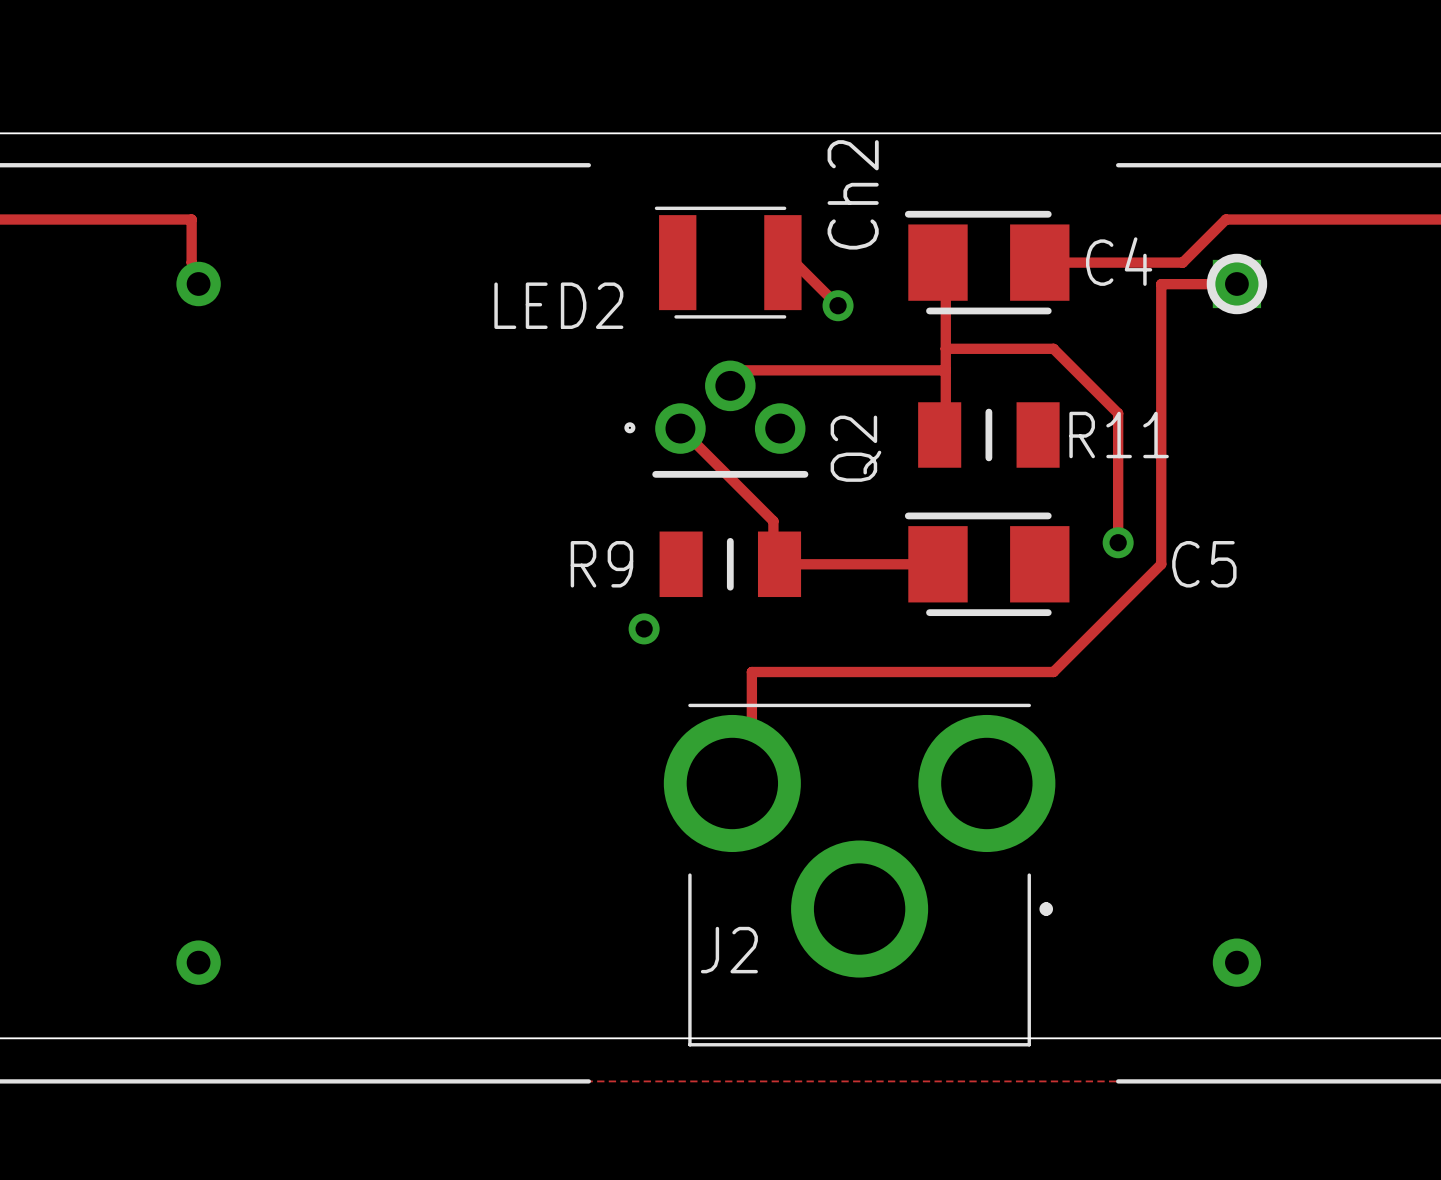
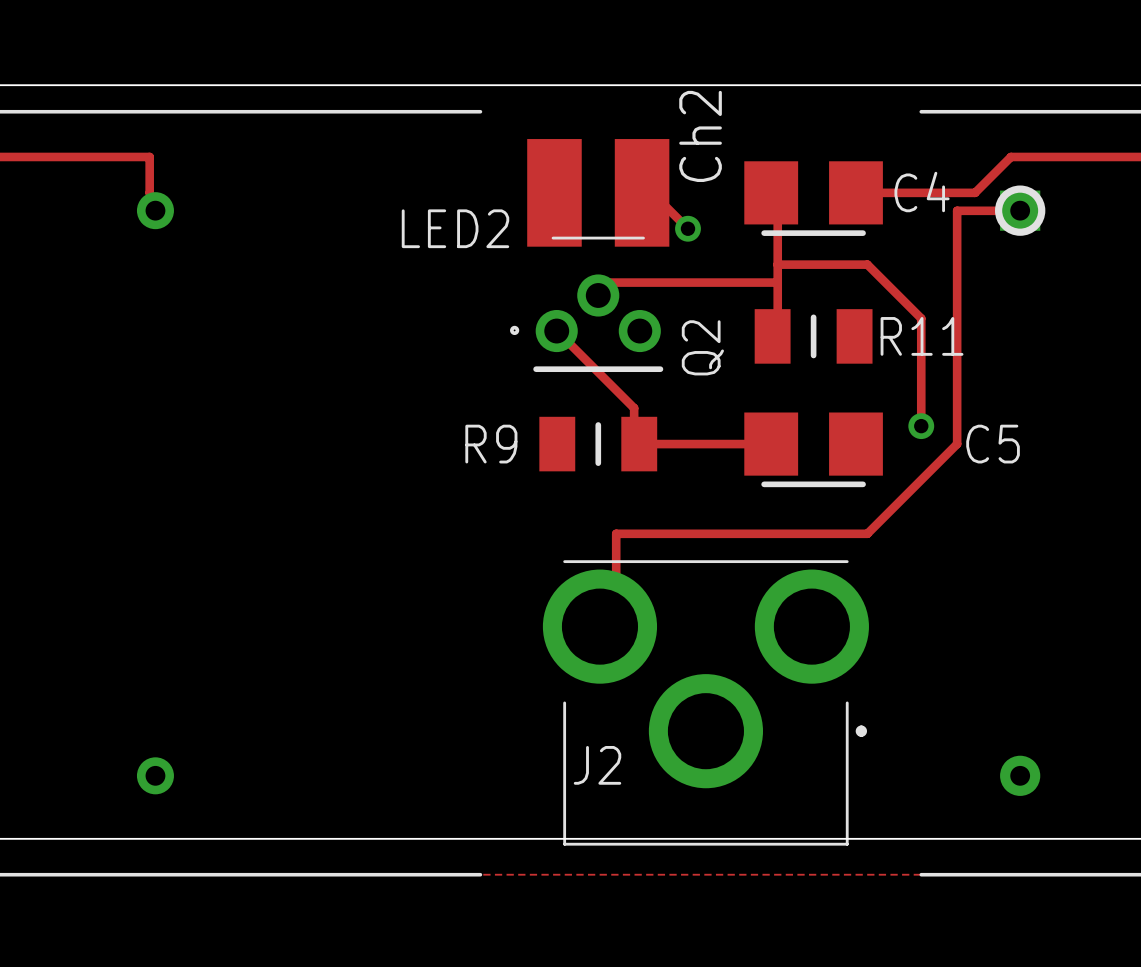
LED2 footprint: [654, 206, 802, 319] -> [527, 139, 670, 247]
C4 footprint: [904, 210, 1070, 315] -> [744, 161, 883, 236]
C5 footprint: [904, 512, 1070, 617] -> [744, 412, 883, 488]
via: (644, 628) -> none

